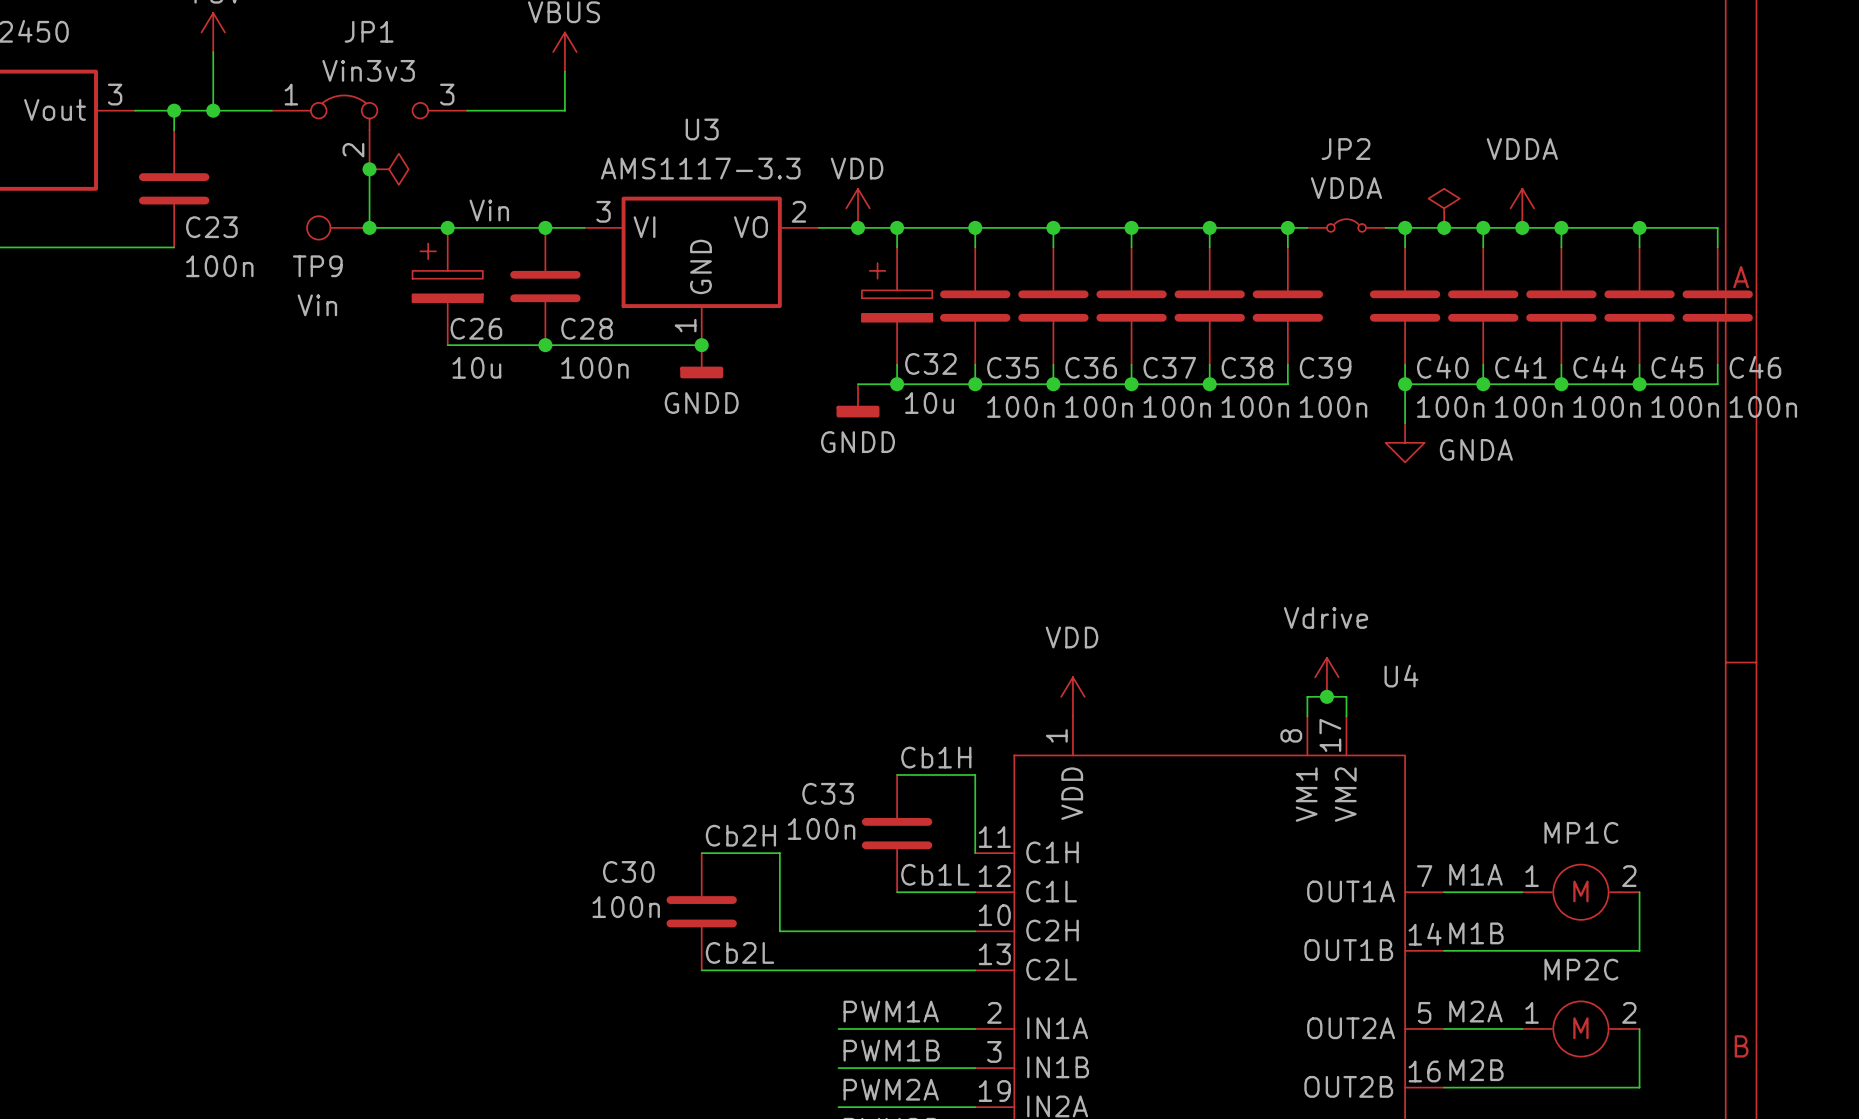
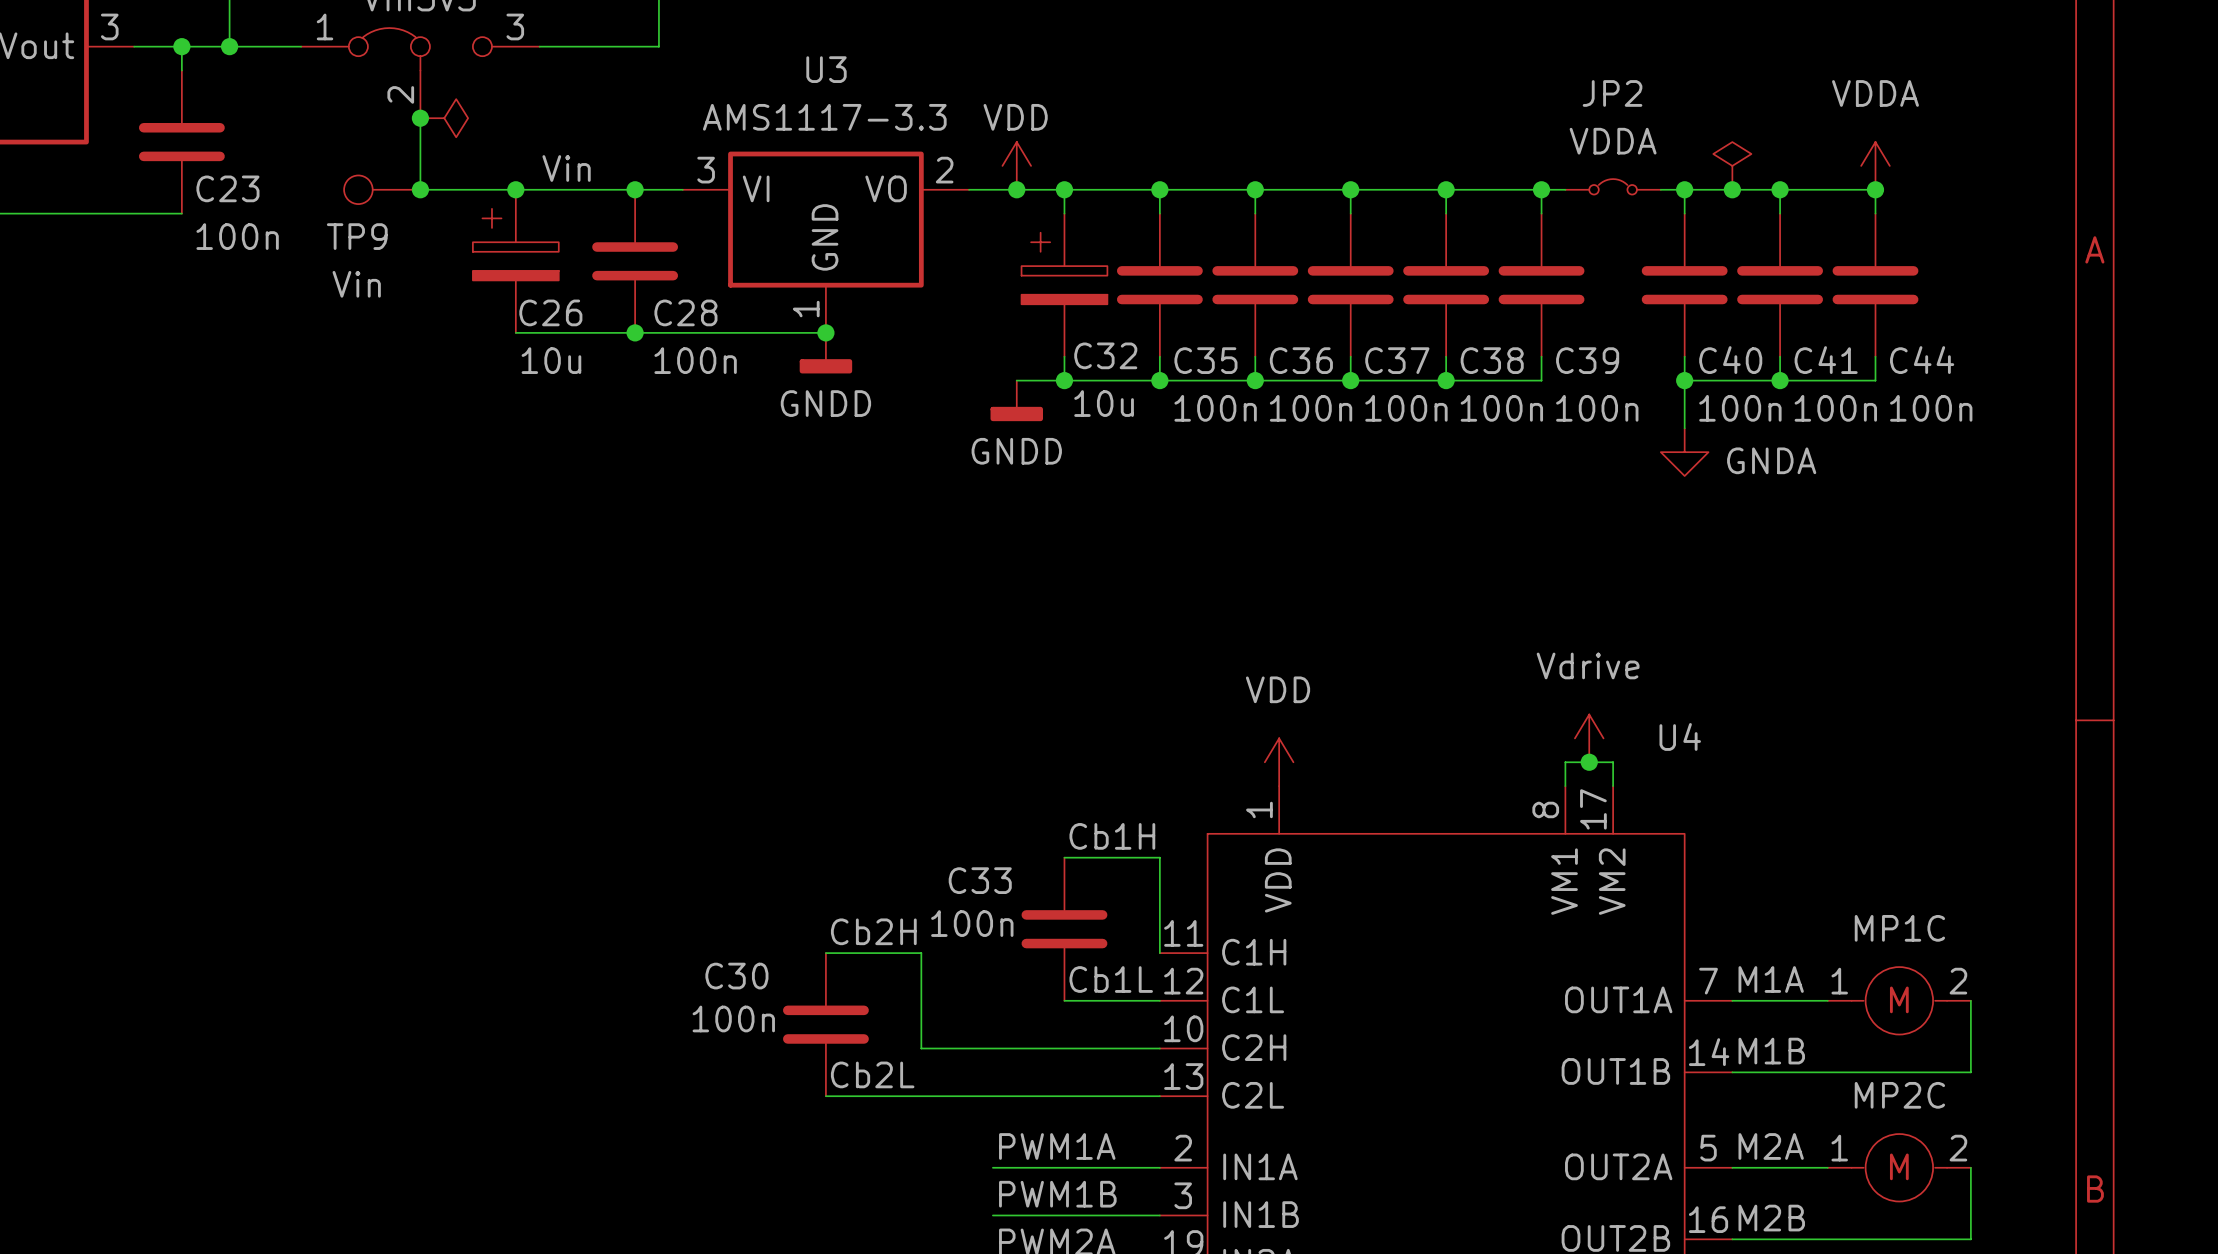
power symbol position: VDDA (1522, 208) -> VDDA (1875, 165)
junction: (1522, 227) -> none
wire: (1561, 227) (1717, 227) (1717, 247) -> none
wire: (1639, 227) (1639, 247) -> none
junction: (1639, 227) -> none
C45: 100n (1639, 306) -> none
C46: 100n (1717, 306) -> none
wire: (1639, 364) (1639, 384) -> none
wire: (1717, 364) (1717, 384) (1561, 384) -> none
junction: (1561, 384) -> none
junction: (1639, 384) -> none

